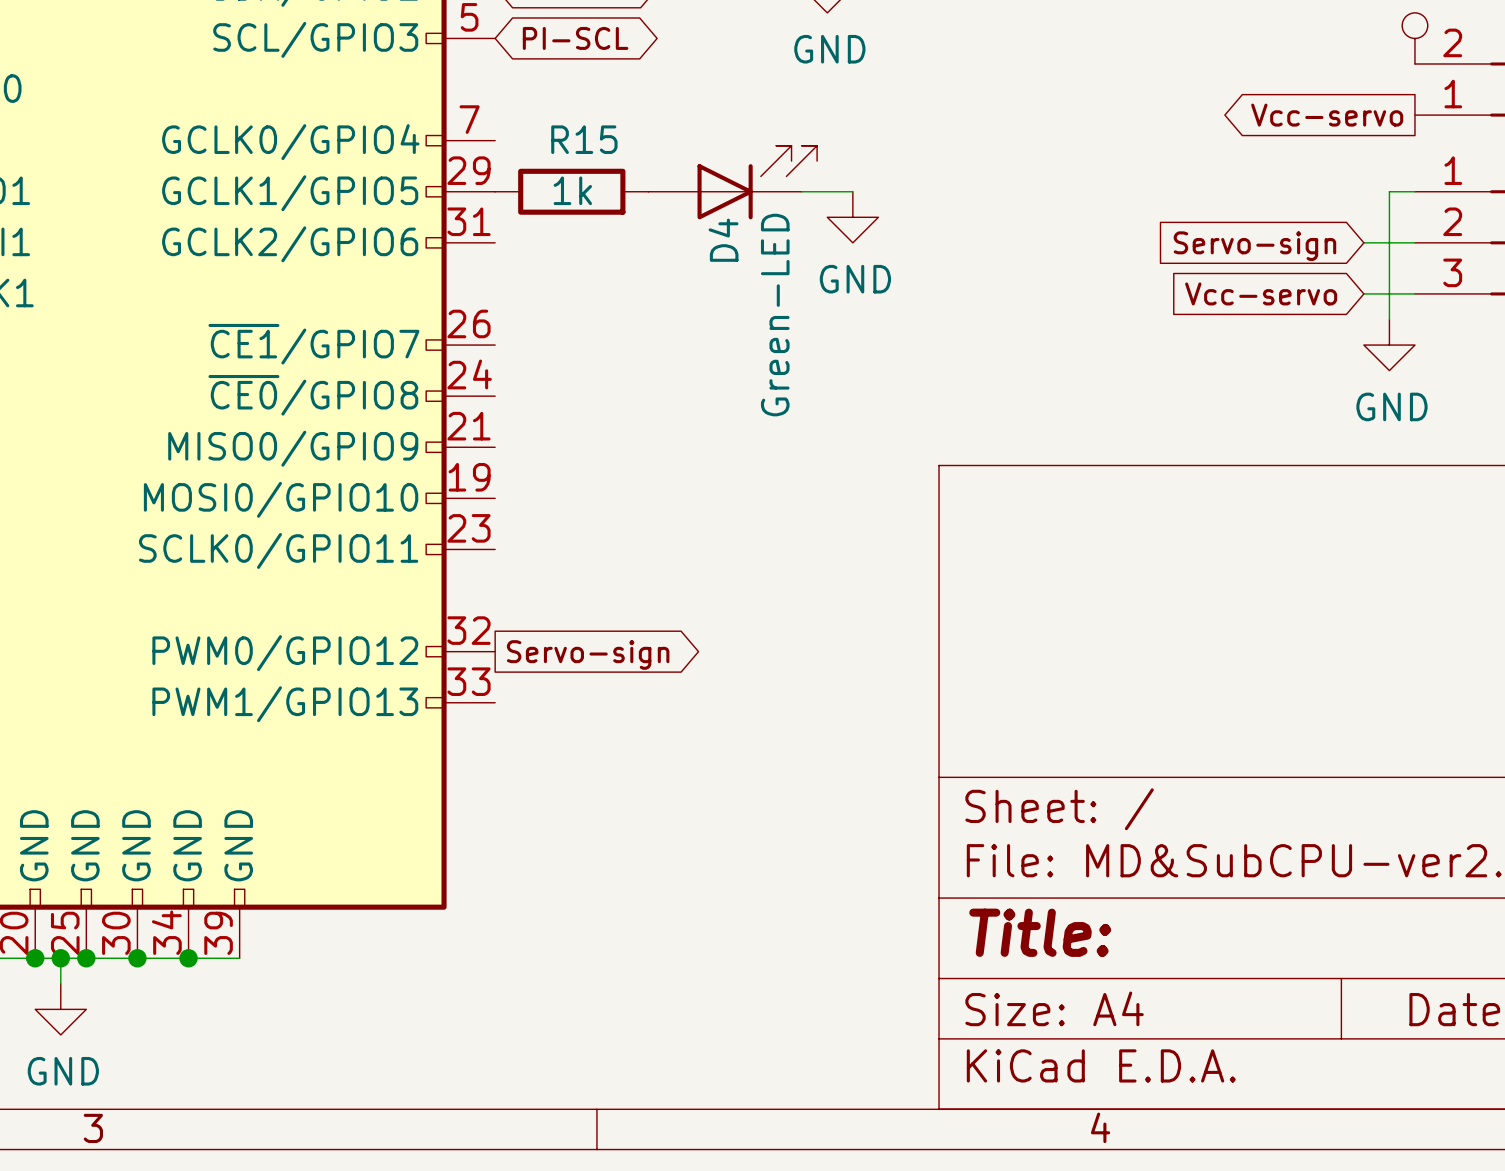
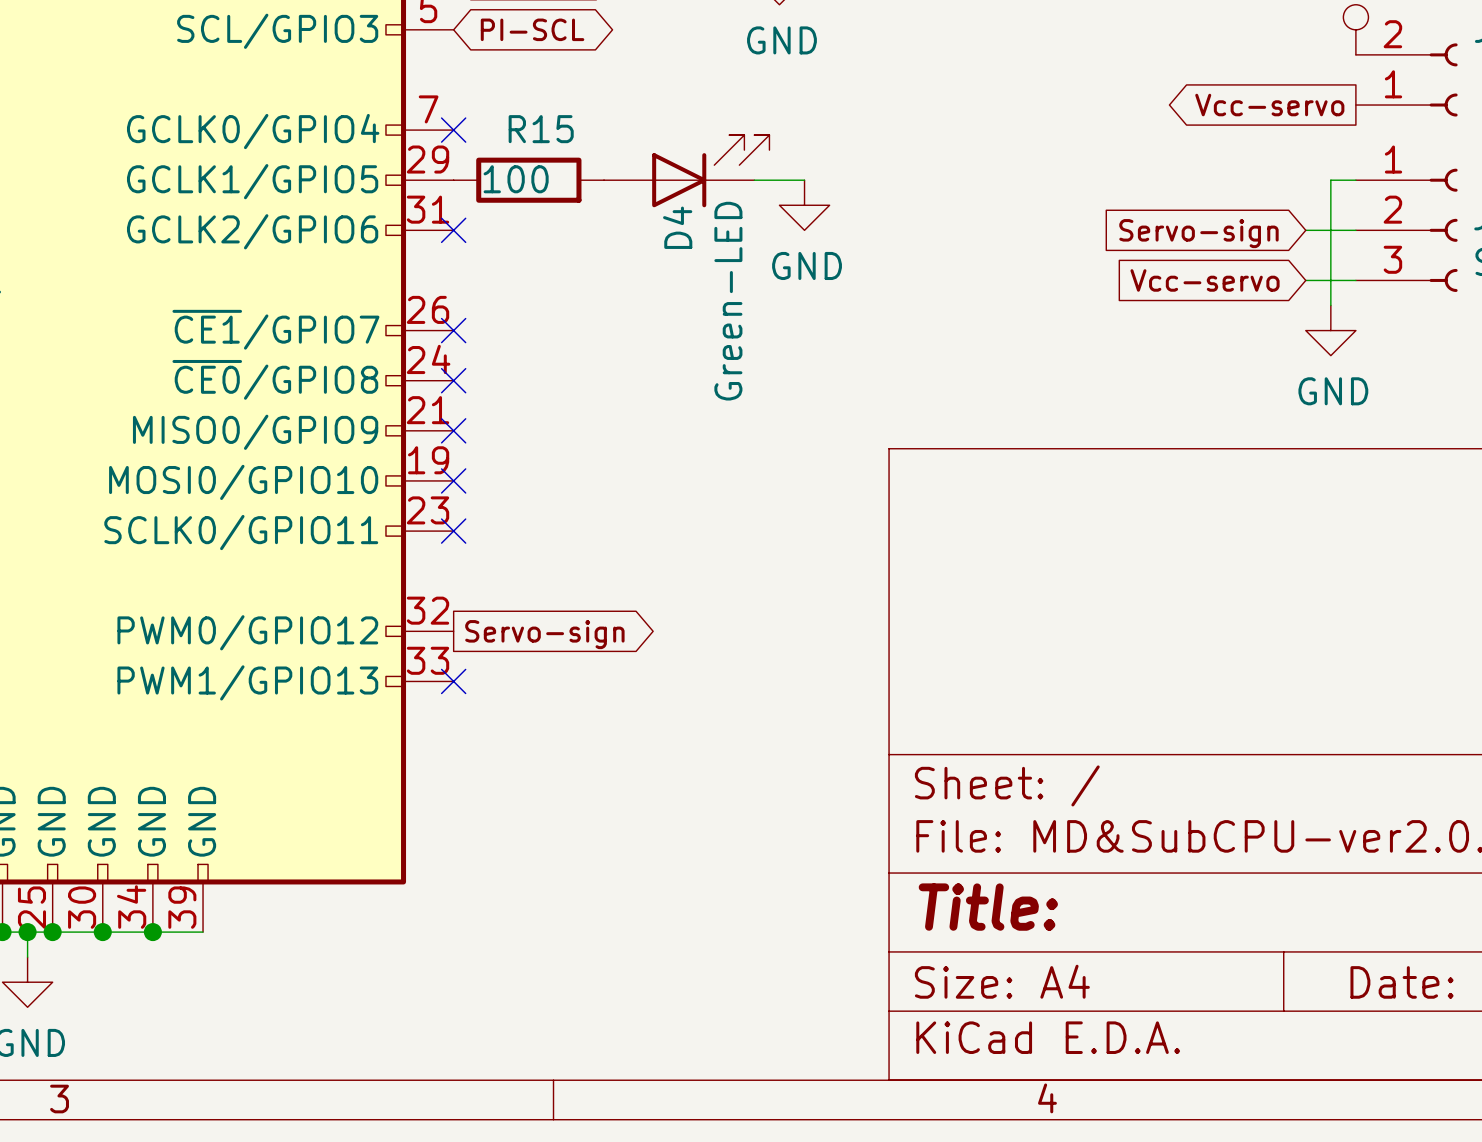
no-connect mark: none -> (453, 130)
R15 value: 1k (572, 190) -> 100 (516, 179)
no-connect mark: none -> (453, 230)
no-connect mark: none -> (453, 330)
no-connect mark: none -> (453, 380)
no-connect mark: none -> (453, 430)
no-connect mark: none -> (453, 480)
no-connect mark: none -> (453, 531)
no-connect mark: none -> (453, 681)

